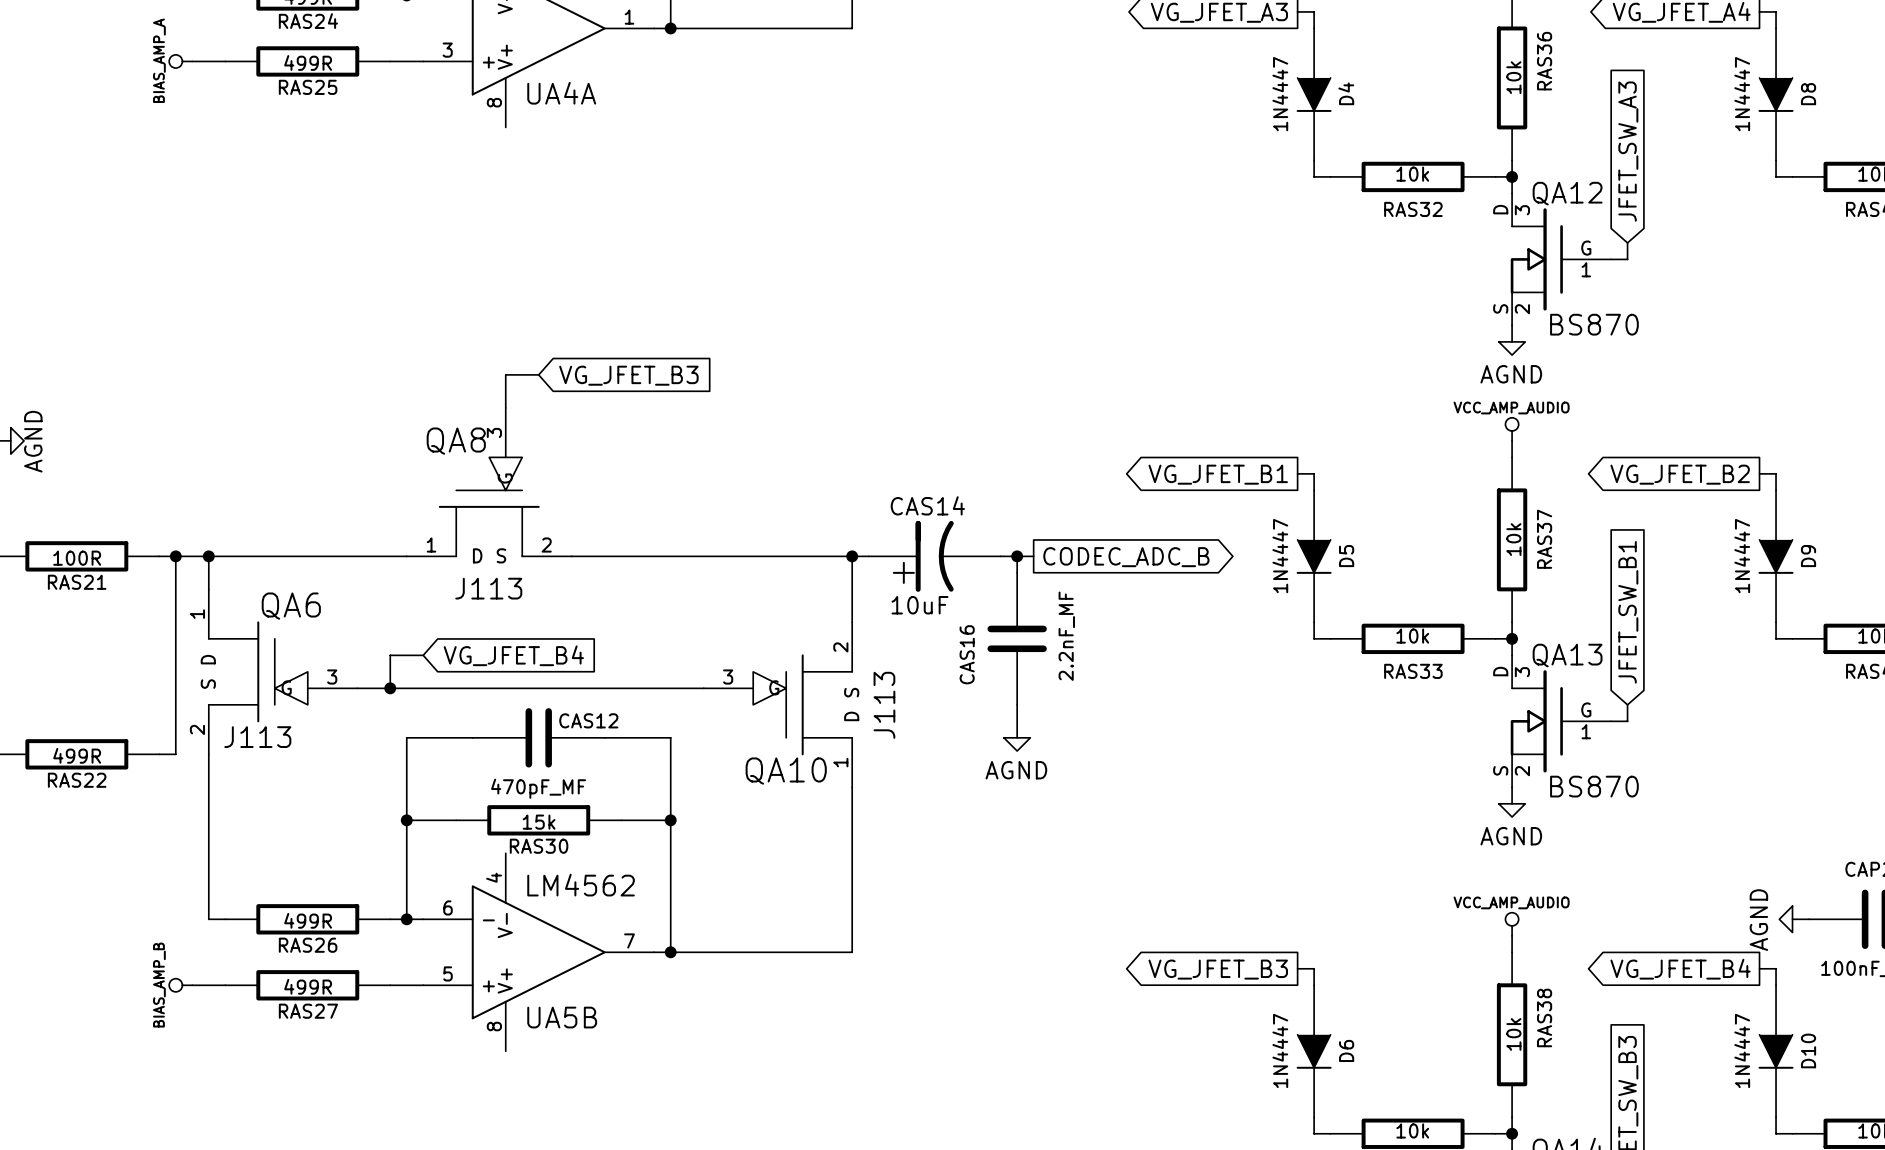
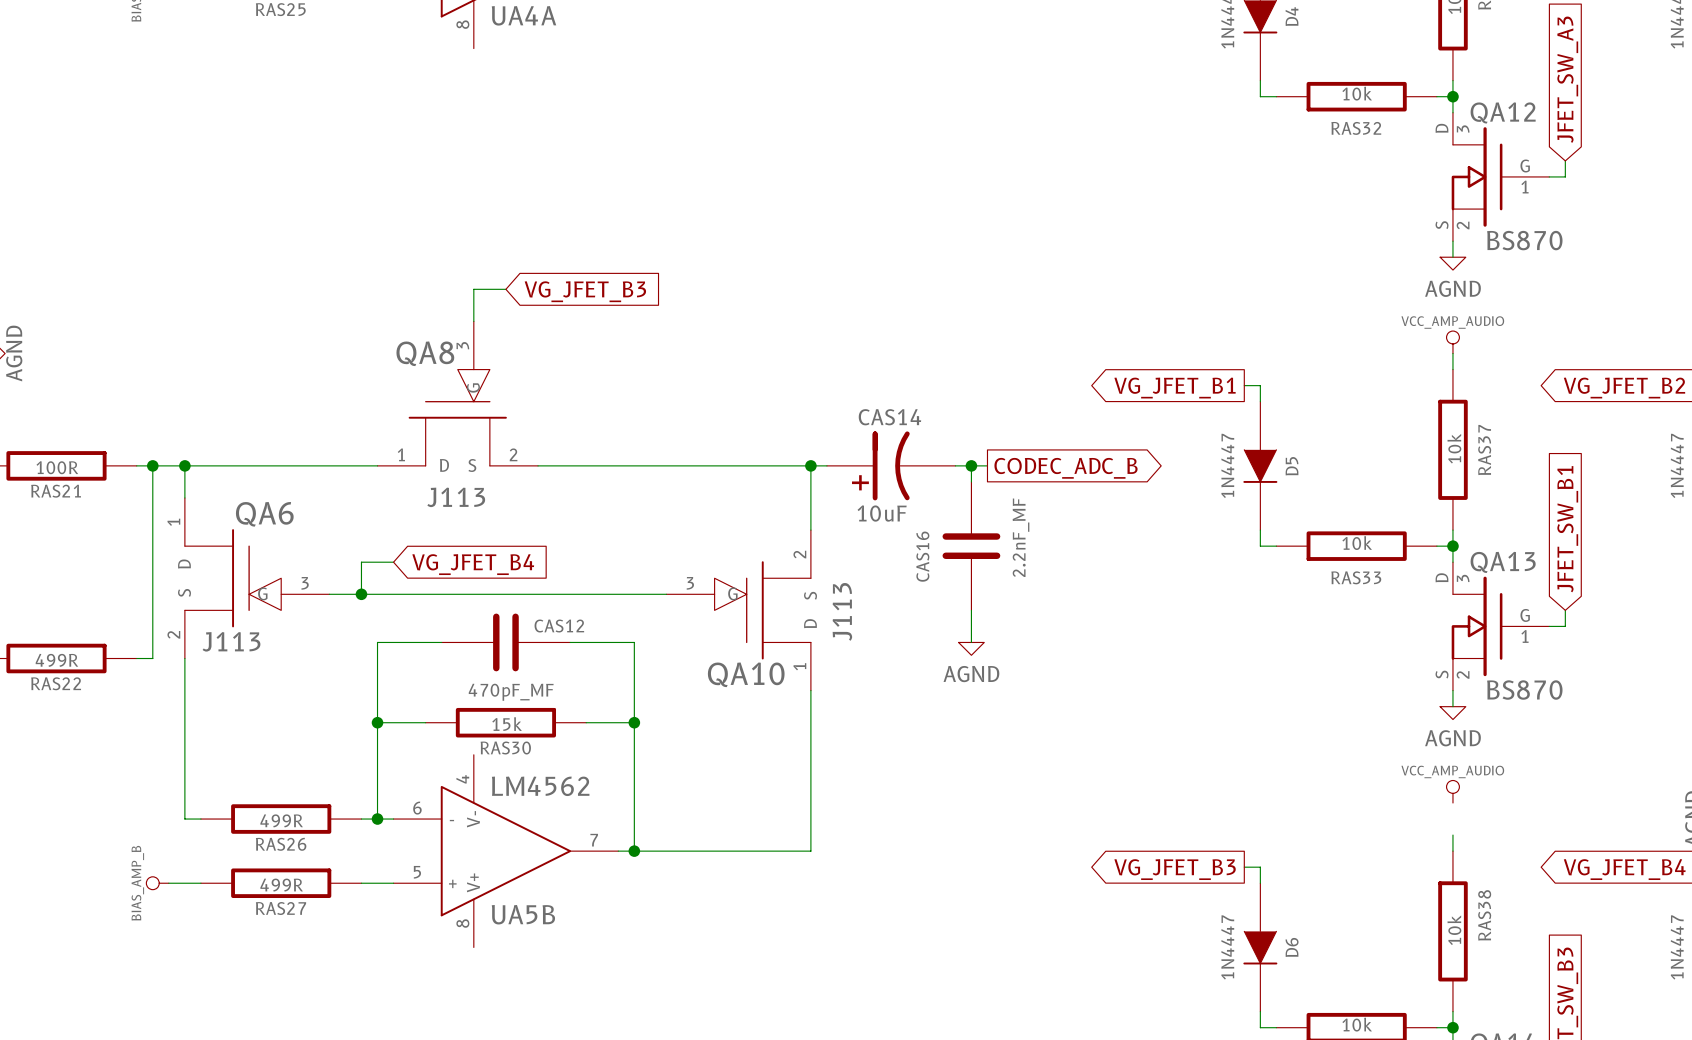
power symbol position: VCC_AMP_AUDIO (1512, 924) -> VCC_AMP_AUDIO (1452, 791)

